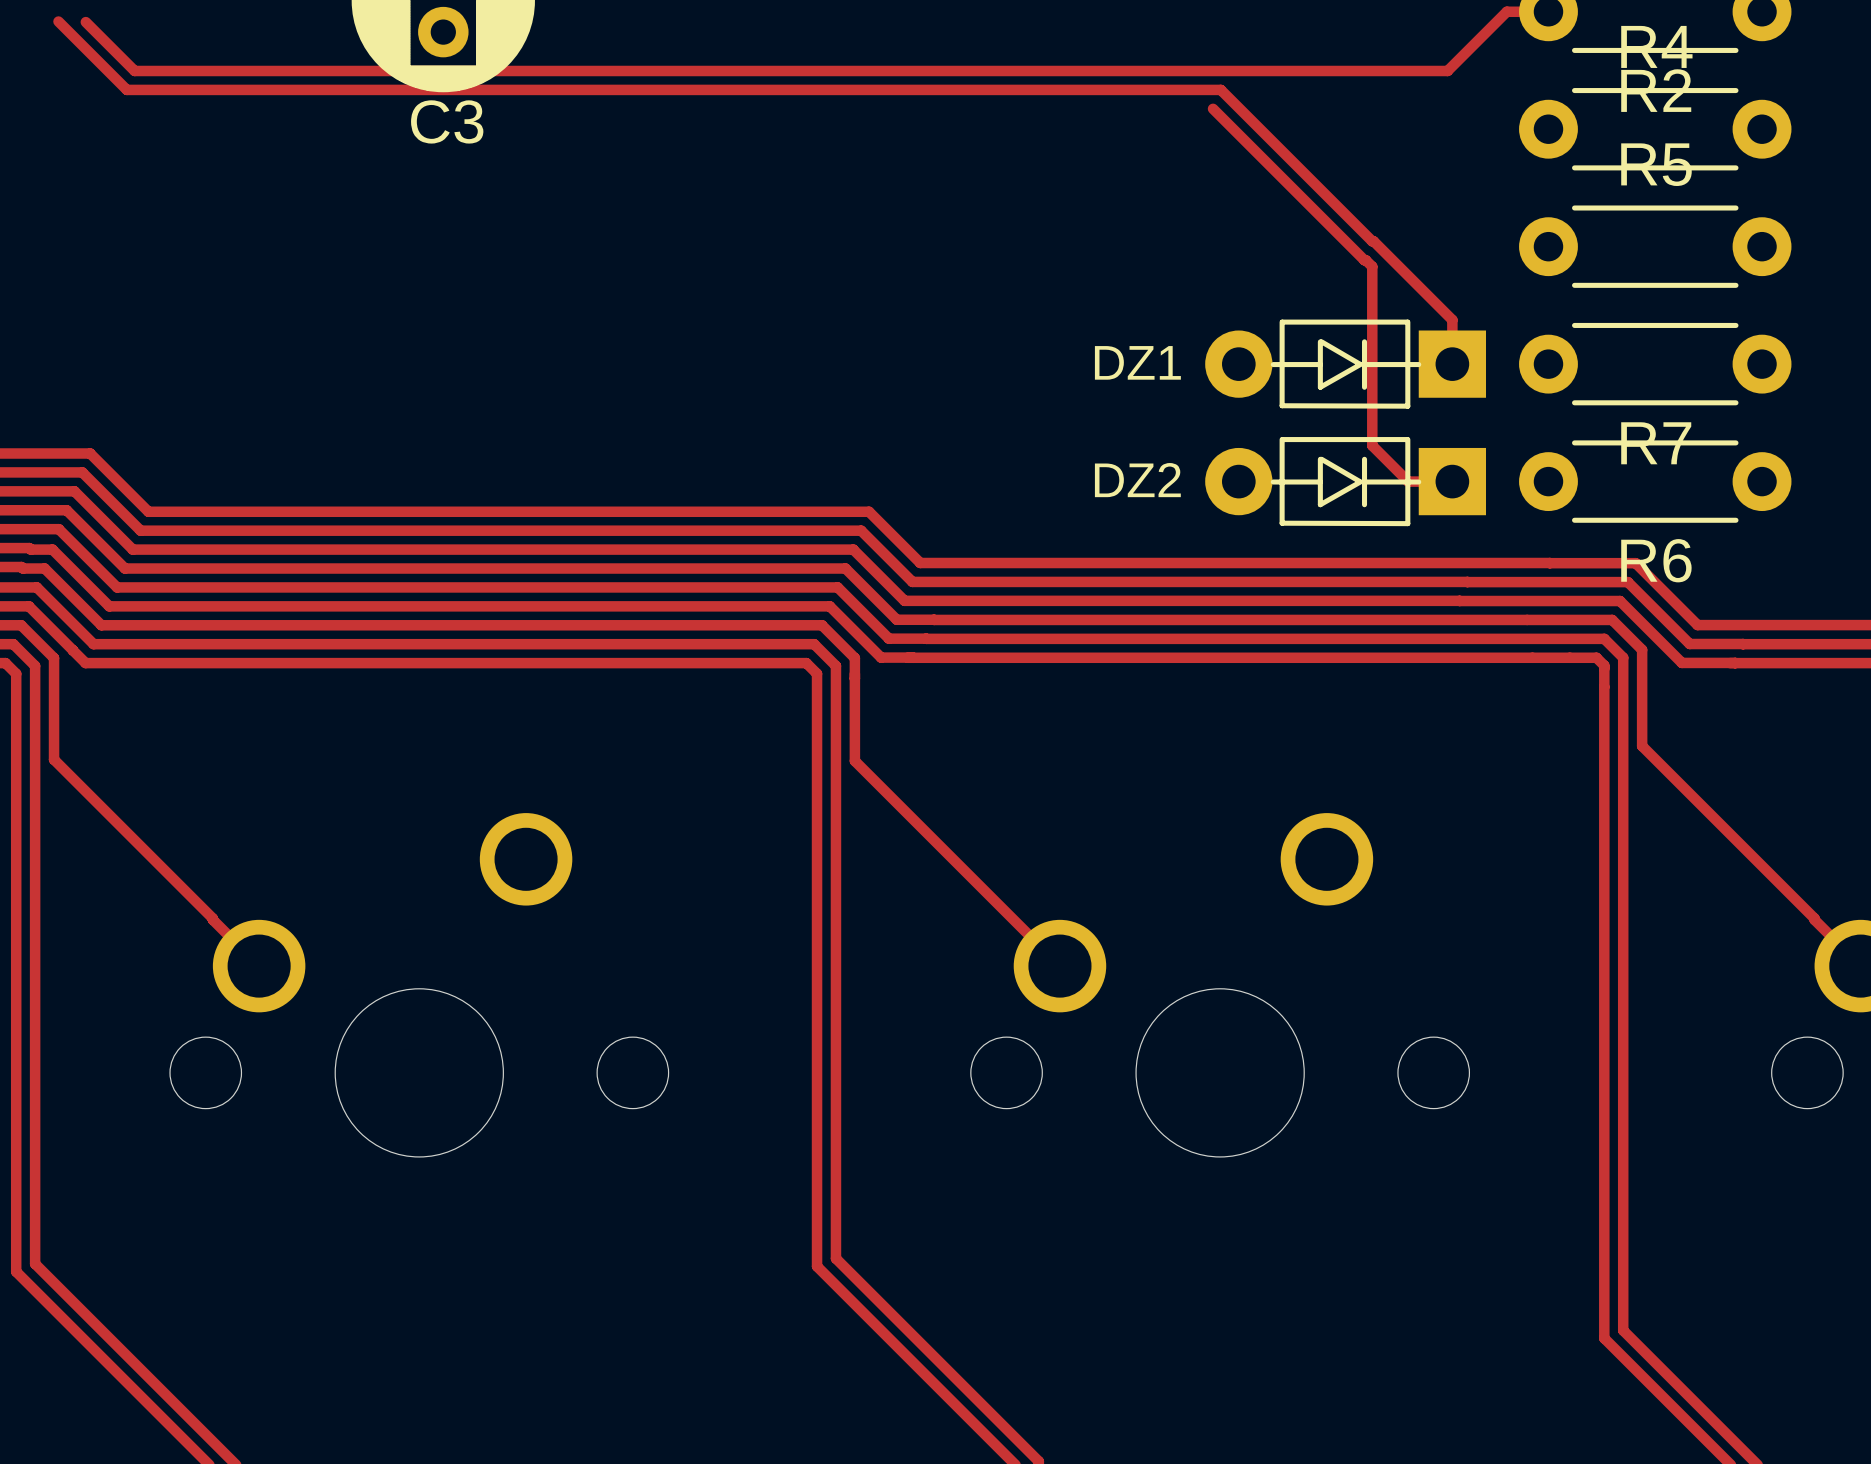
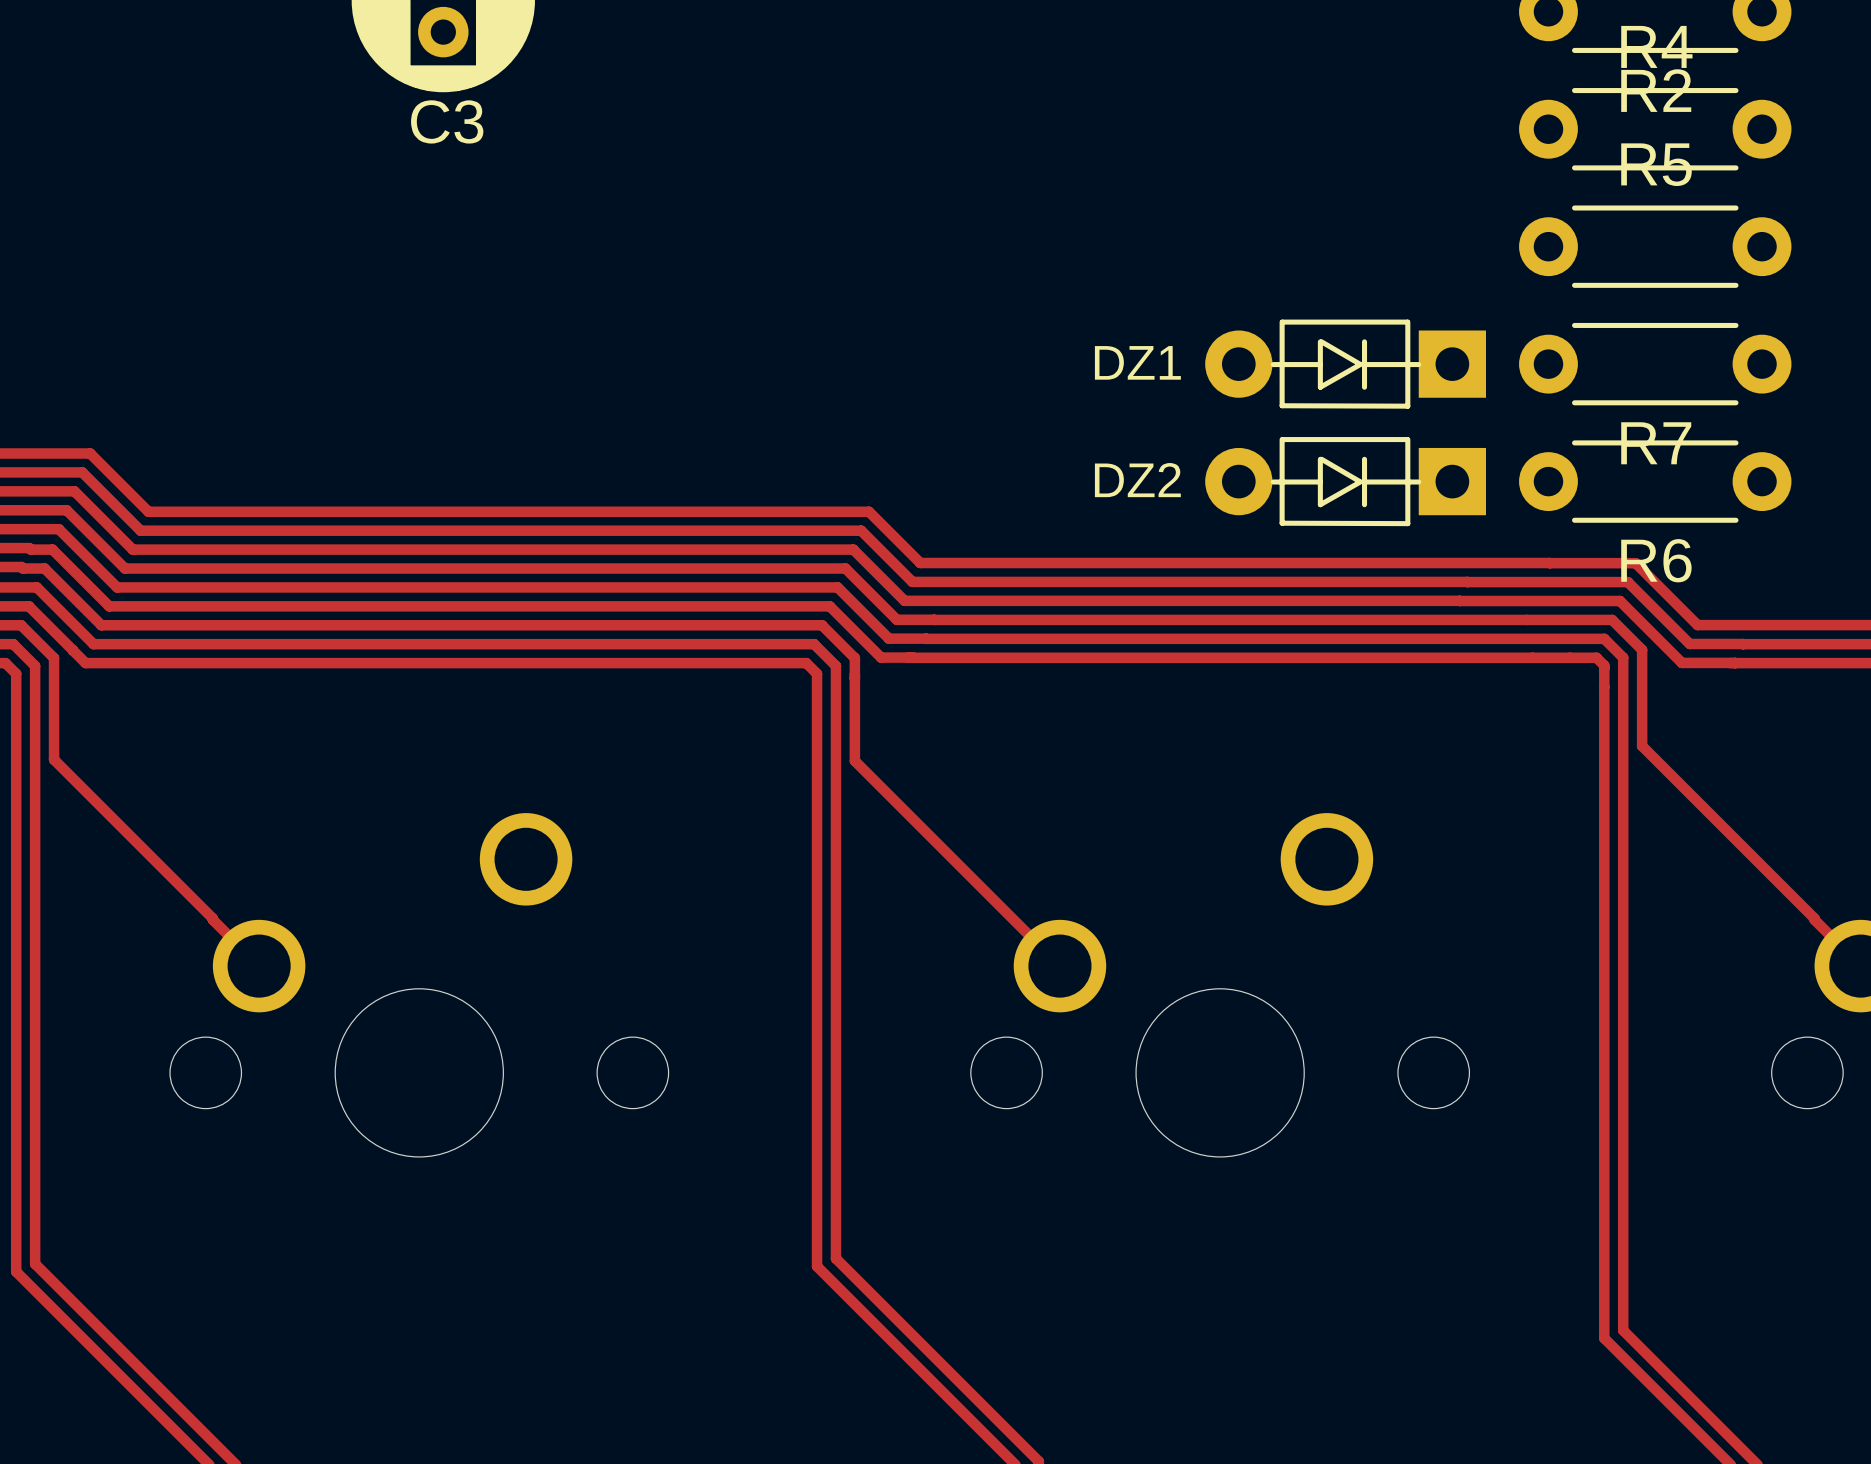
track: (1548, 11) (1506, 11) (1447, 70) (134, 70) (85, 22) -> none
track: (58, 21) (126, 89) (1220, 89) (1452, 319) (1452, 364) -> none
track: (1213, 108) (1372, 266) (1372, 445) (1408, 481) (1452, 481) -> none

